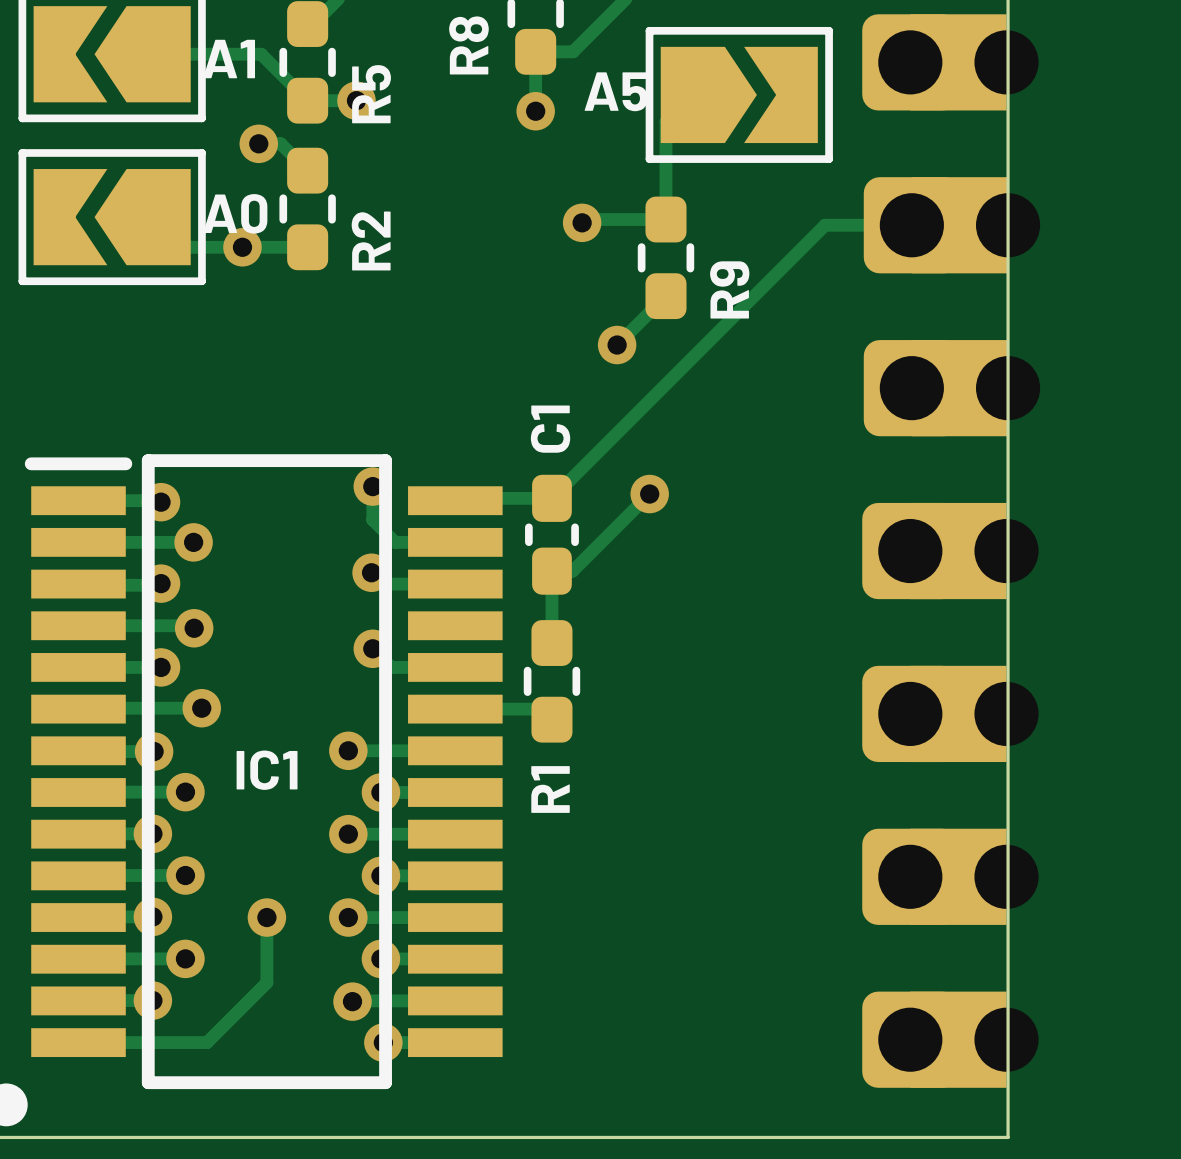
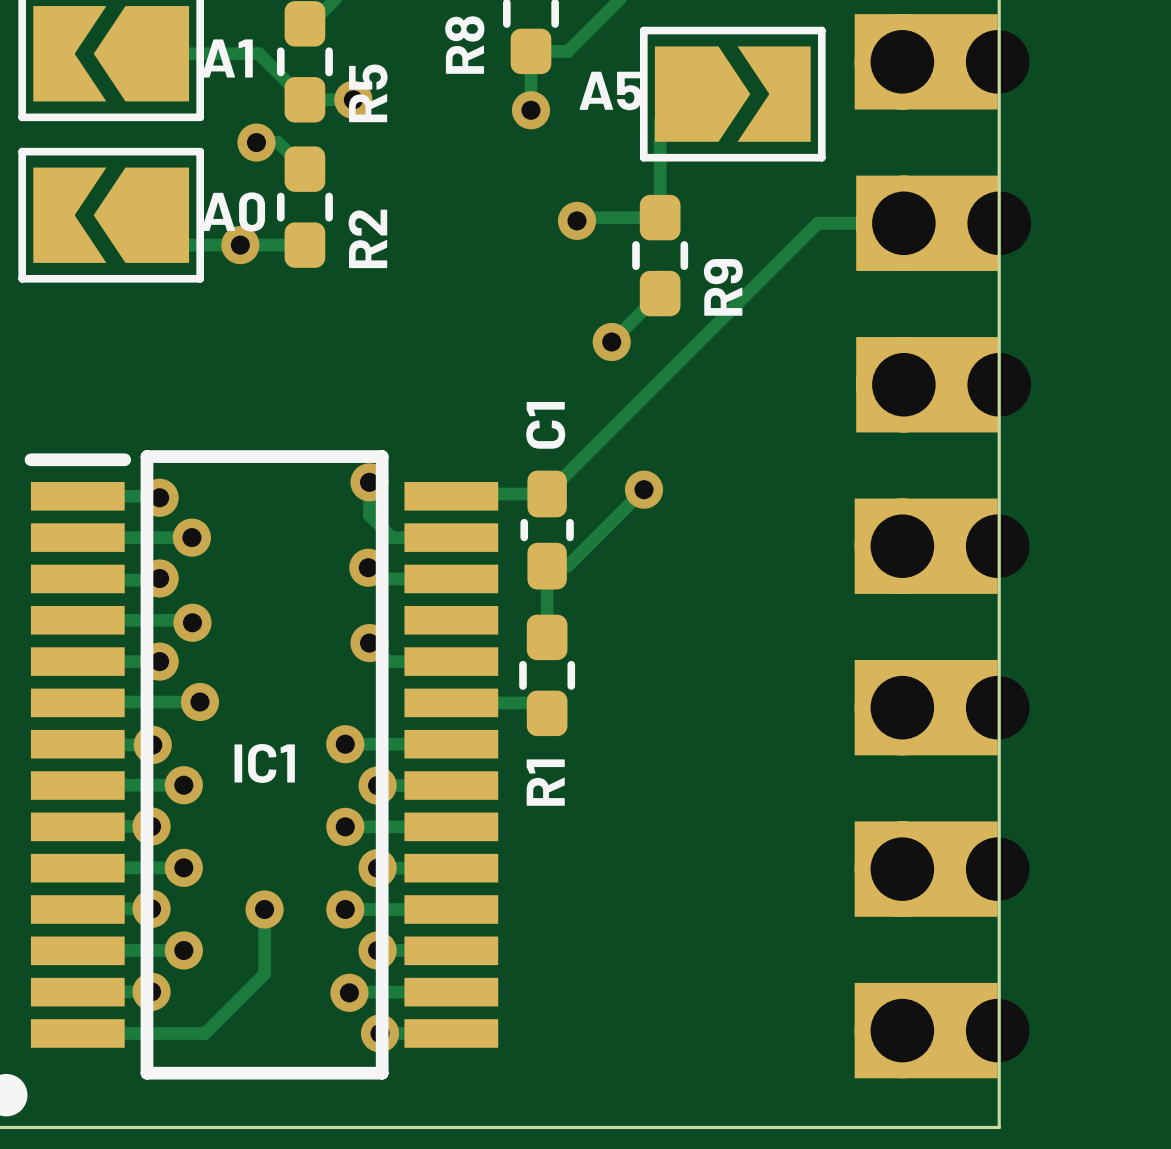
part footprint: [862, 14, 1039, 111] -> [854, 14, 1030, 110]
part footprint: [863, 177, 1041, 274] -> [856, 175, 1032, 271]
part footprint: [863, 340, 1041, 437] -> [856, 337, 1032, 433]
part footprint: [862, 502, 1039, 600] -> [854, 498, 1030, 594]
part footprint: [862, 665, 1039, 763] -> [854, 660, 1030, 756]
part footprint: [862, 828, 1039, 925] -> [854, 821, 1030, 917]
part footprint: [862, 991, 1039, 1088] -> [854, 982, 1030, 1079]

